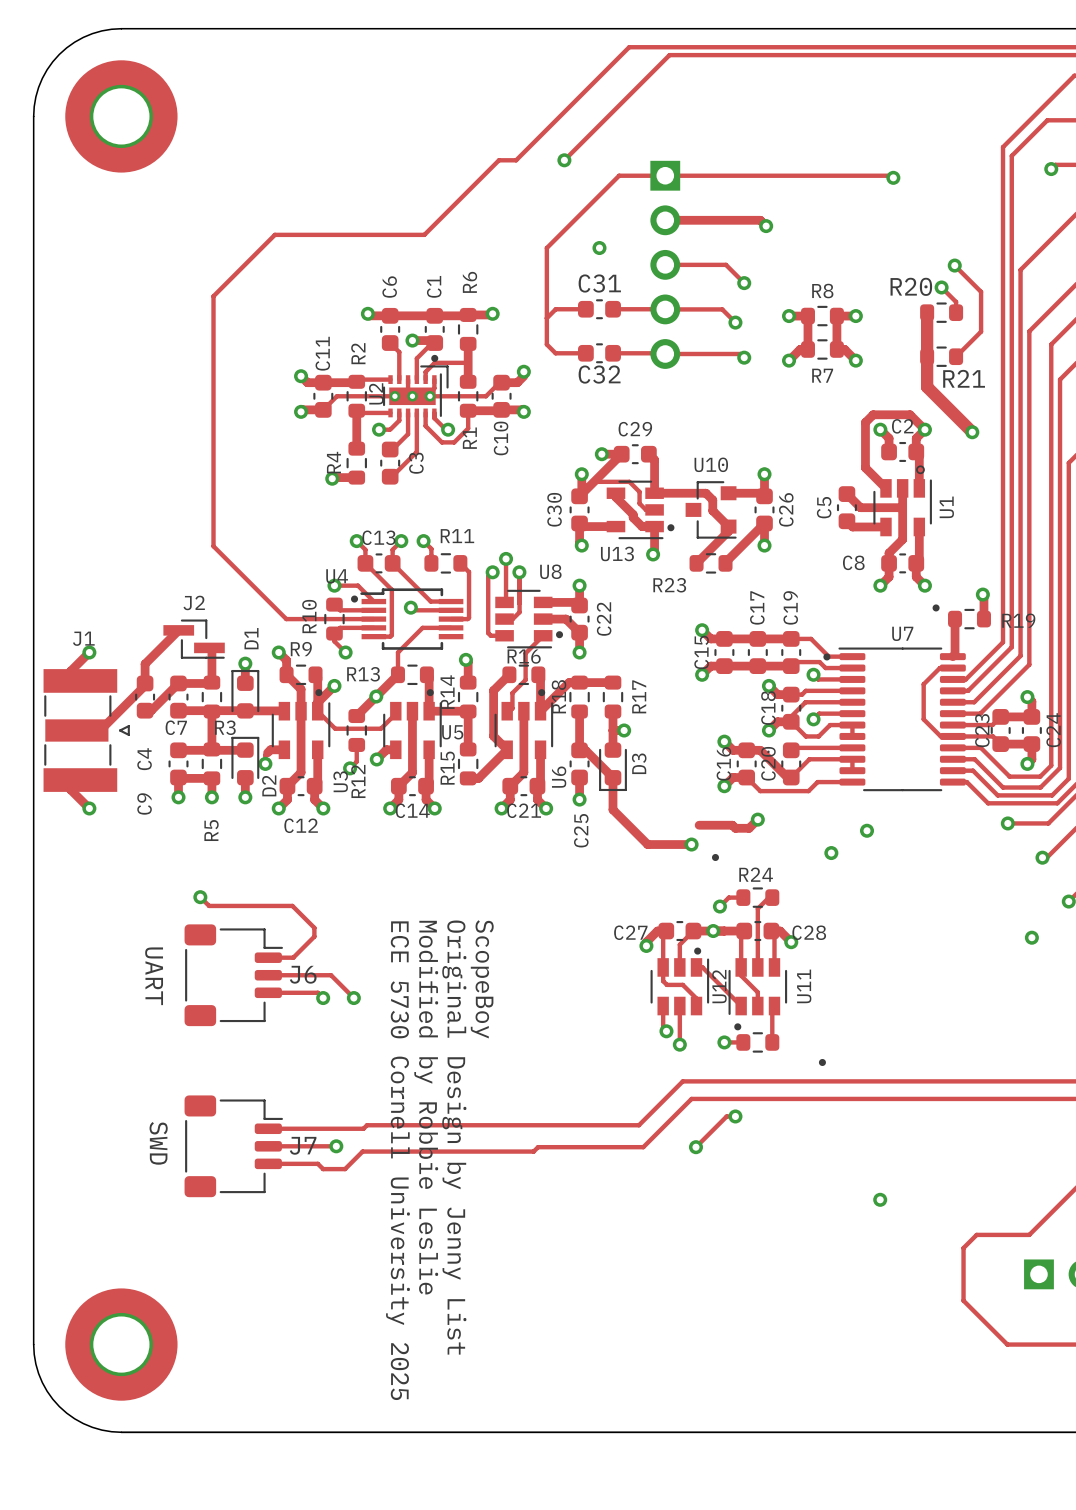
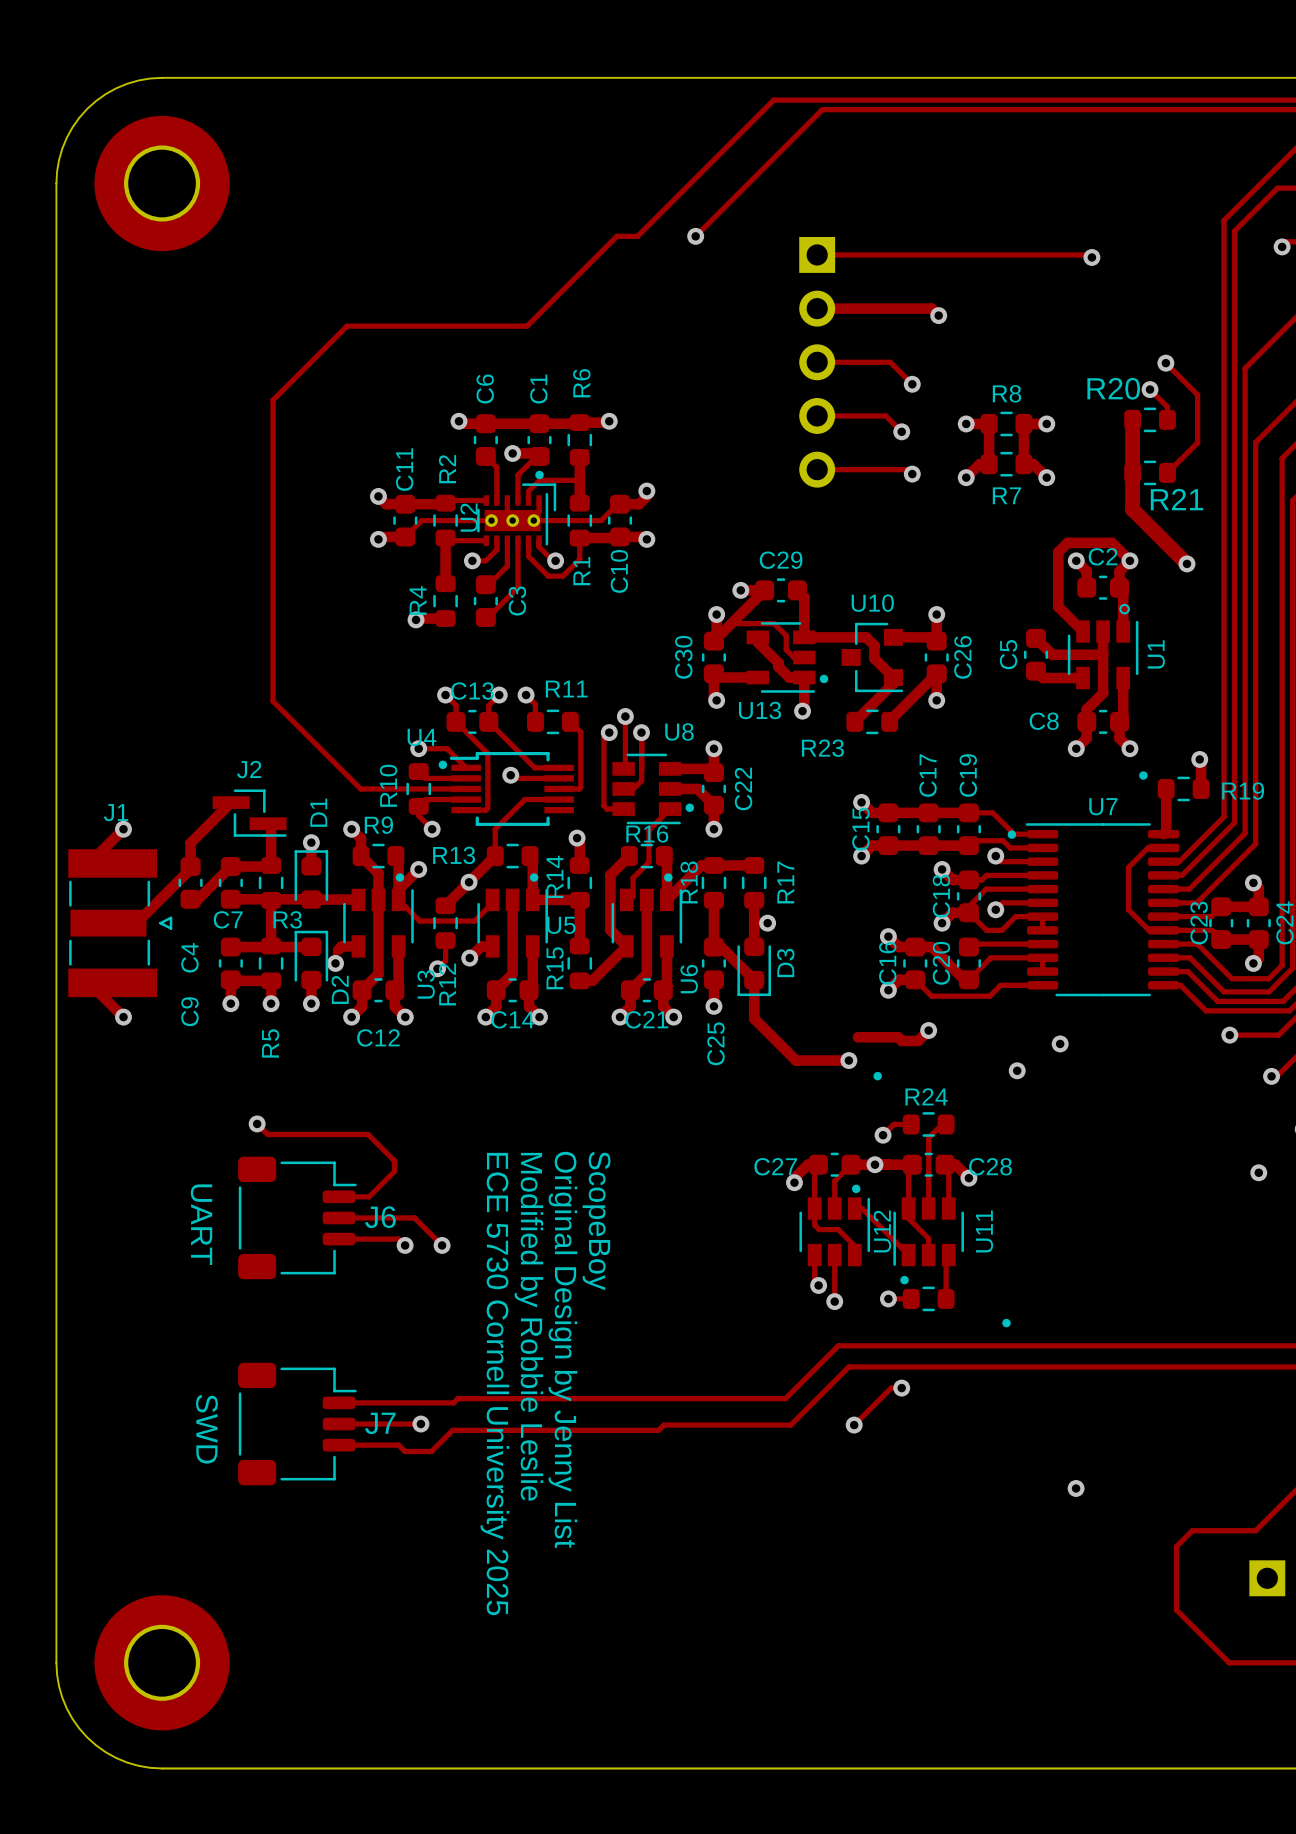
track: (665, 175) (619, 175) (546, 248) (546, 344) (555, 353) (585, 353) -> none
via: (599, 248) -> none
track: (585, 309) (555, 309) (546, 318) -> none
C31: (599, 309) -> none
track: (613, 309) (660, 309) -> none
C32: (599, 353) -> none
track: (613, 353) (665, 353) -> none

